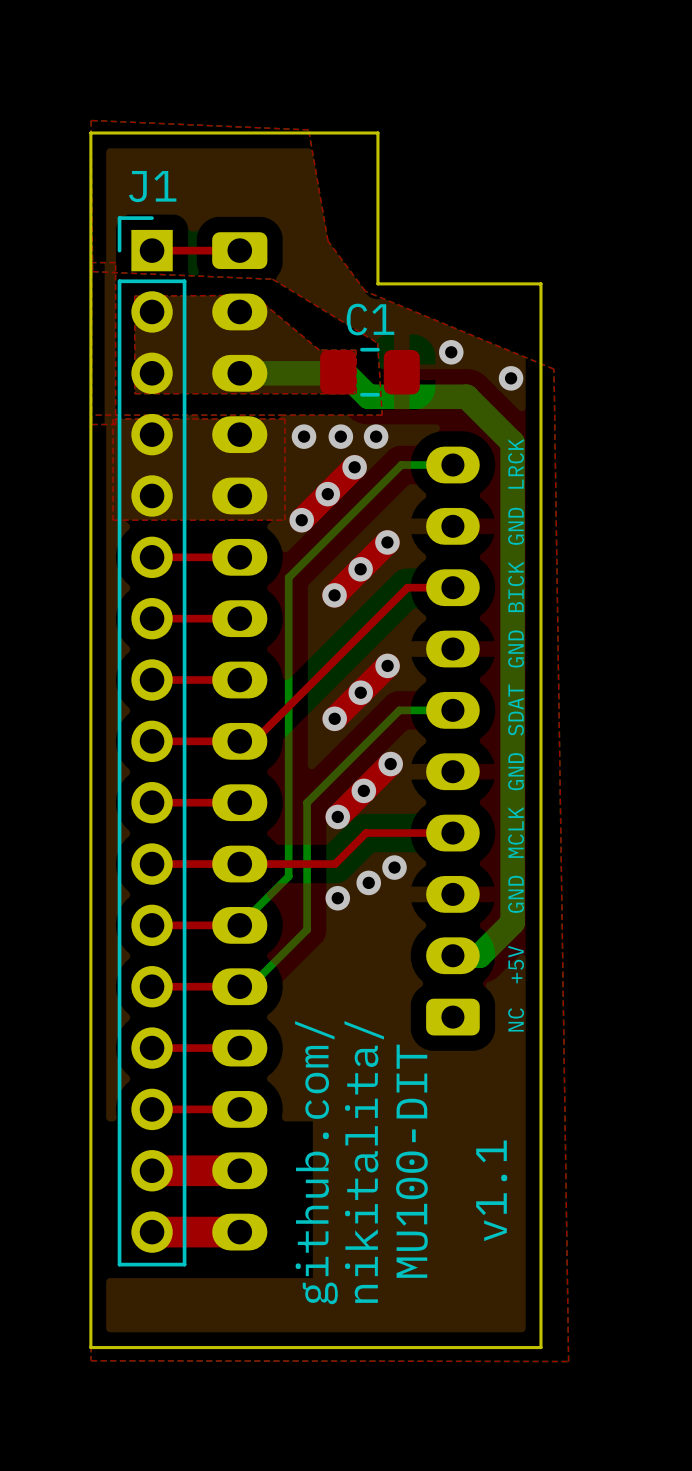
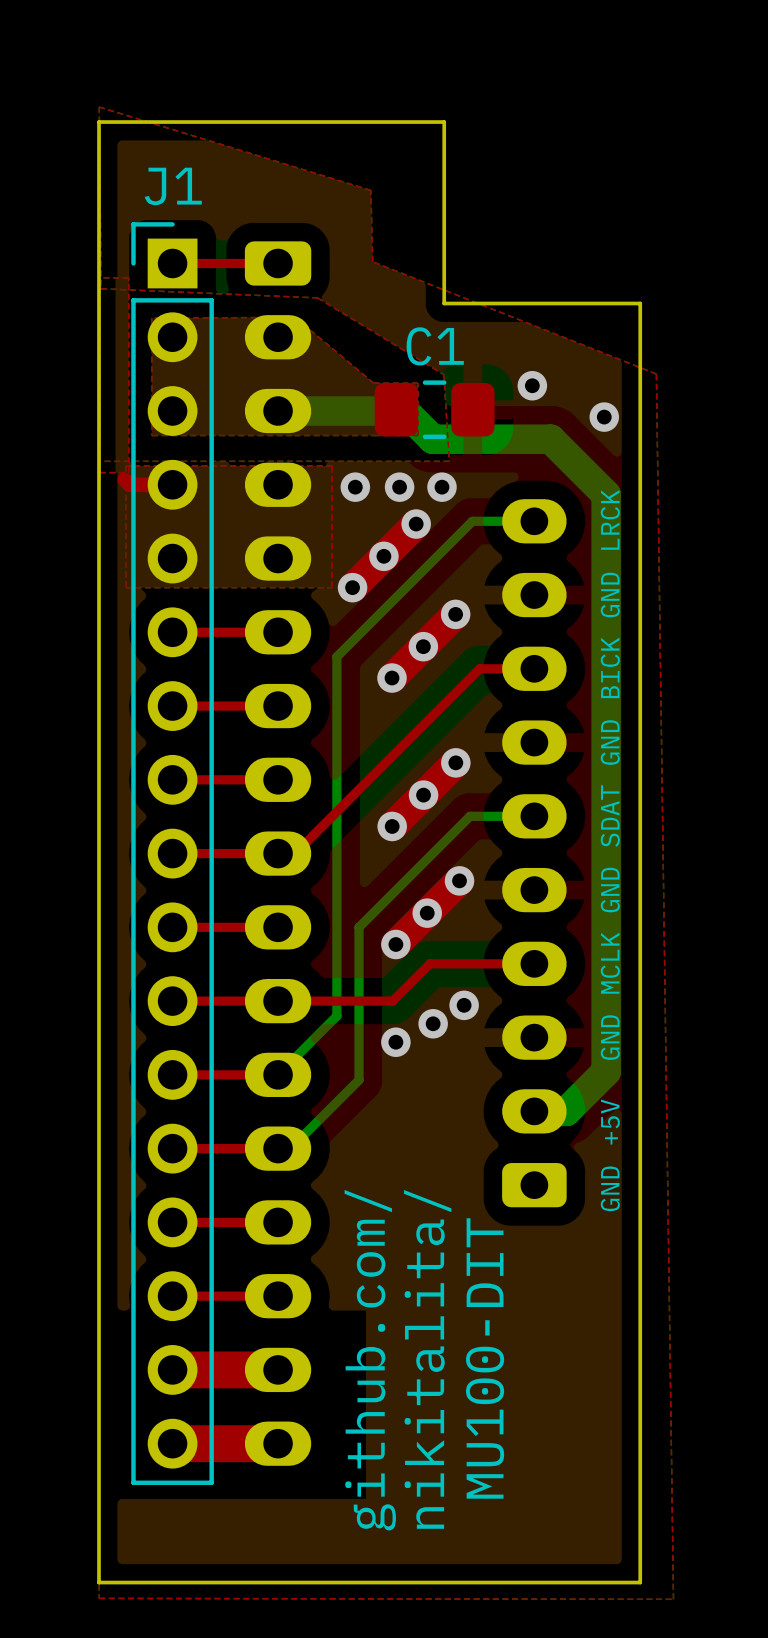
top zone outline: (91, 120) (308, 129) (327, 241) (365, 291) (554, 369) (568, 1361) -> (99, 107) (370, 190) (372, 261) (656, 374) (673, 1599)
top track: none -> (124, 479) (129, 484) (172, 484)
text: NC (516, 1019) -> GND (610, 1188)
text: v1.1 (491, 1190) -> none

